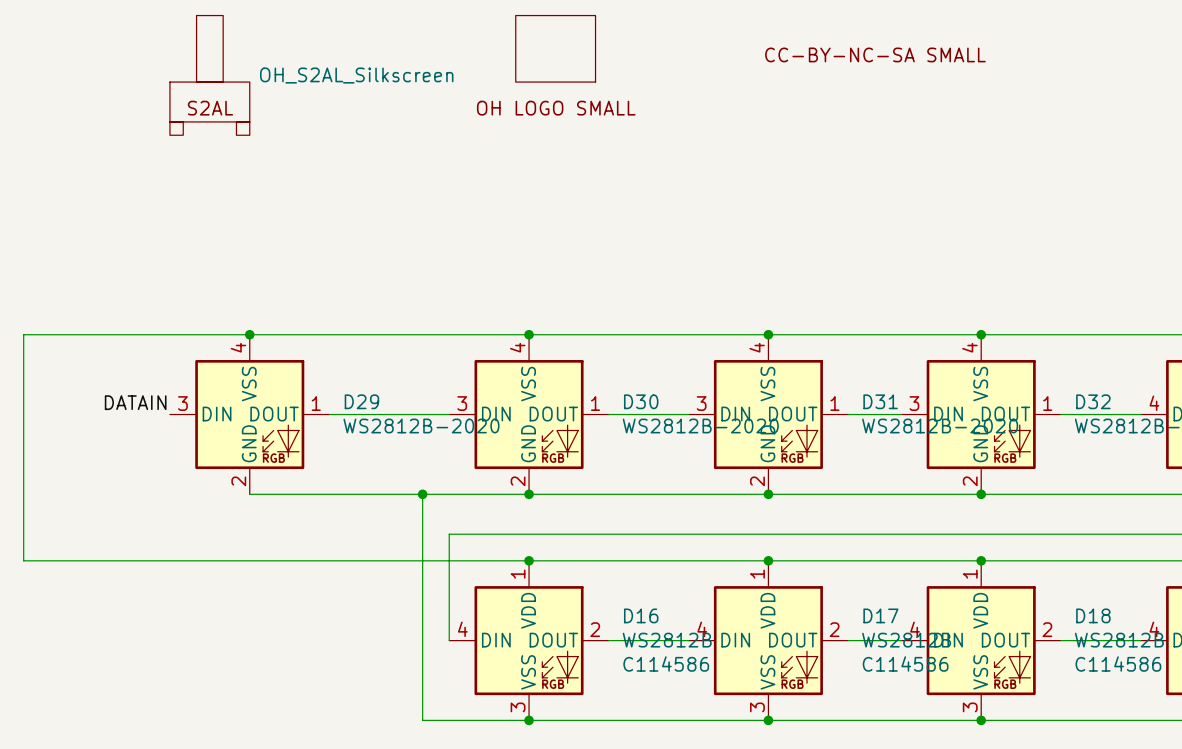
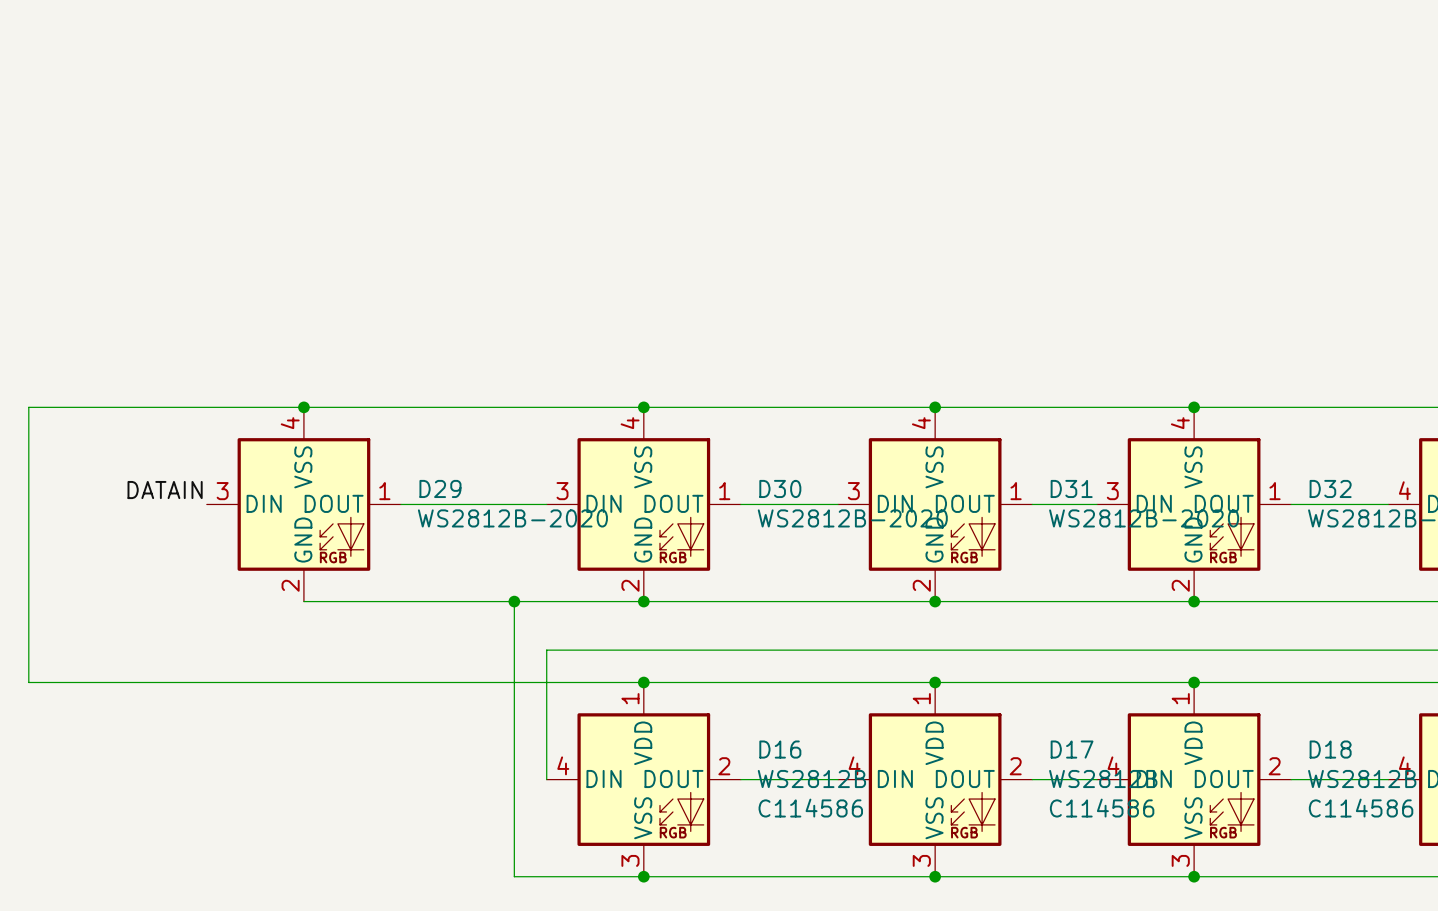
part: (555, 48) -> none
part: (875, 54) -> none
part: OH_S2AL_Silkscreen (209, 75) -> none

